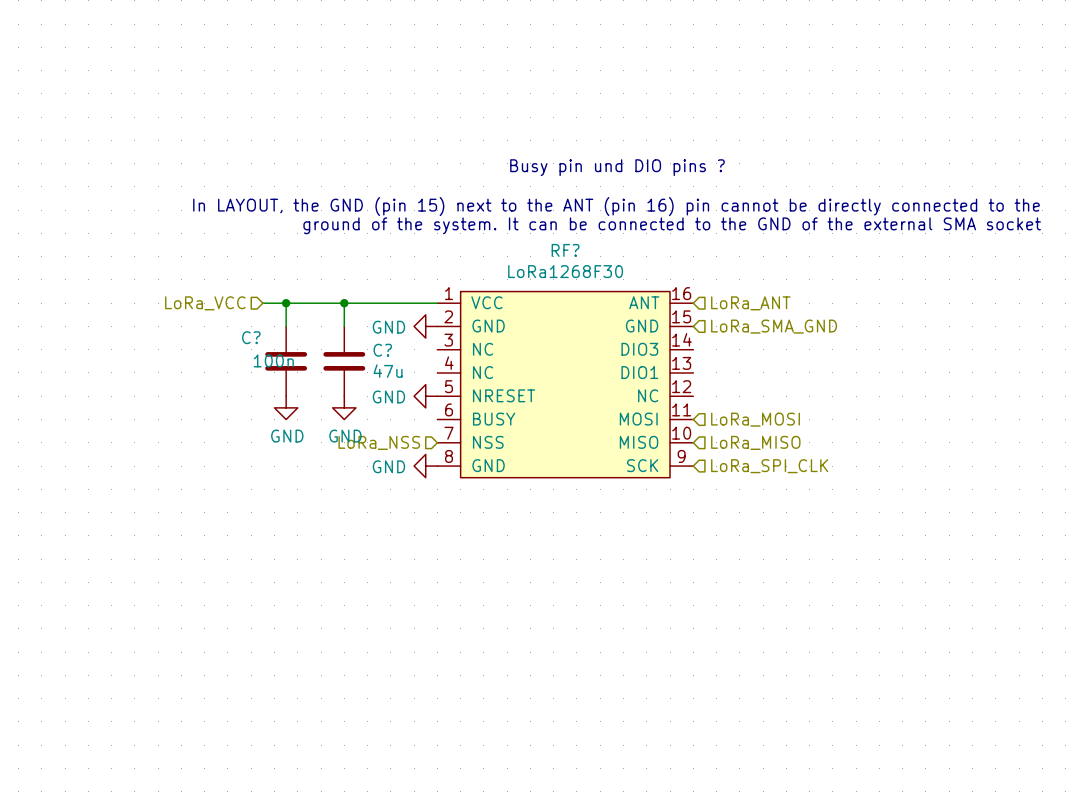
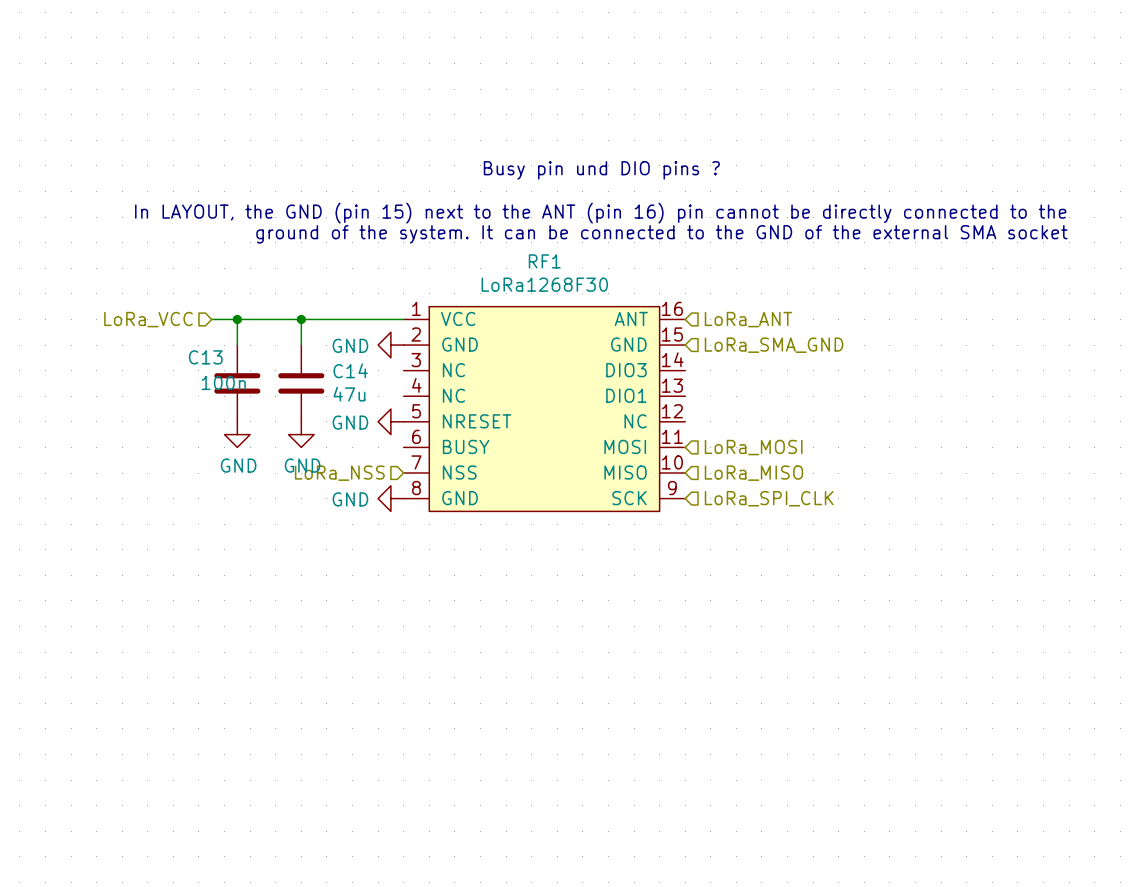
RF? name: RF? (565, 250) -> RF1 (544, 261)
C? name: C? (251, 337) -> C13 (205, 357)
C? name: C? (382, 350) -> C14 (350, 370)

